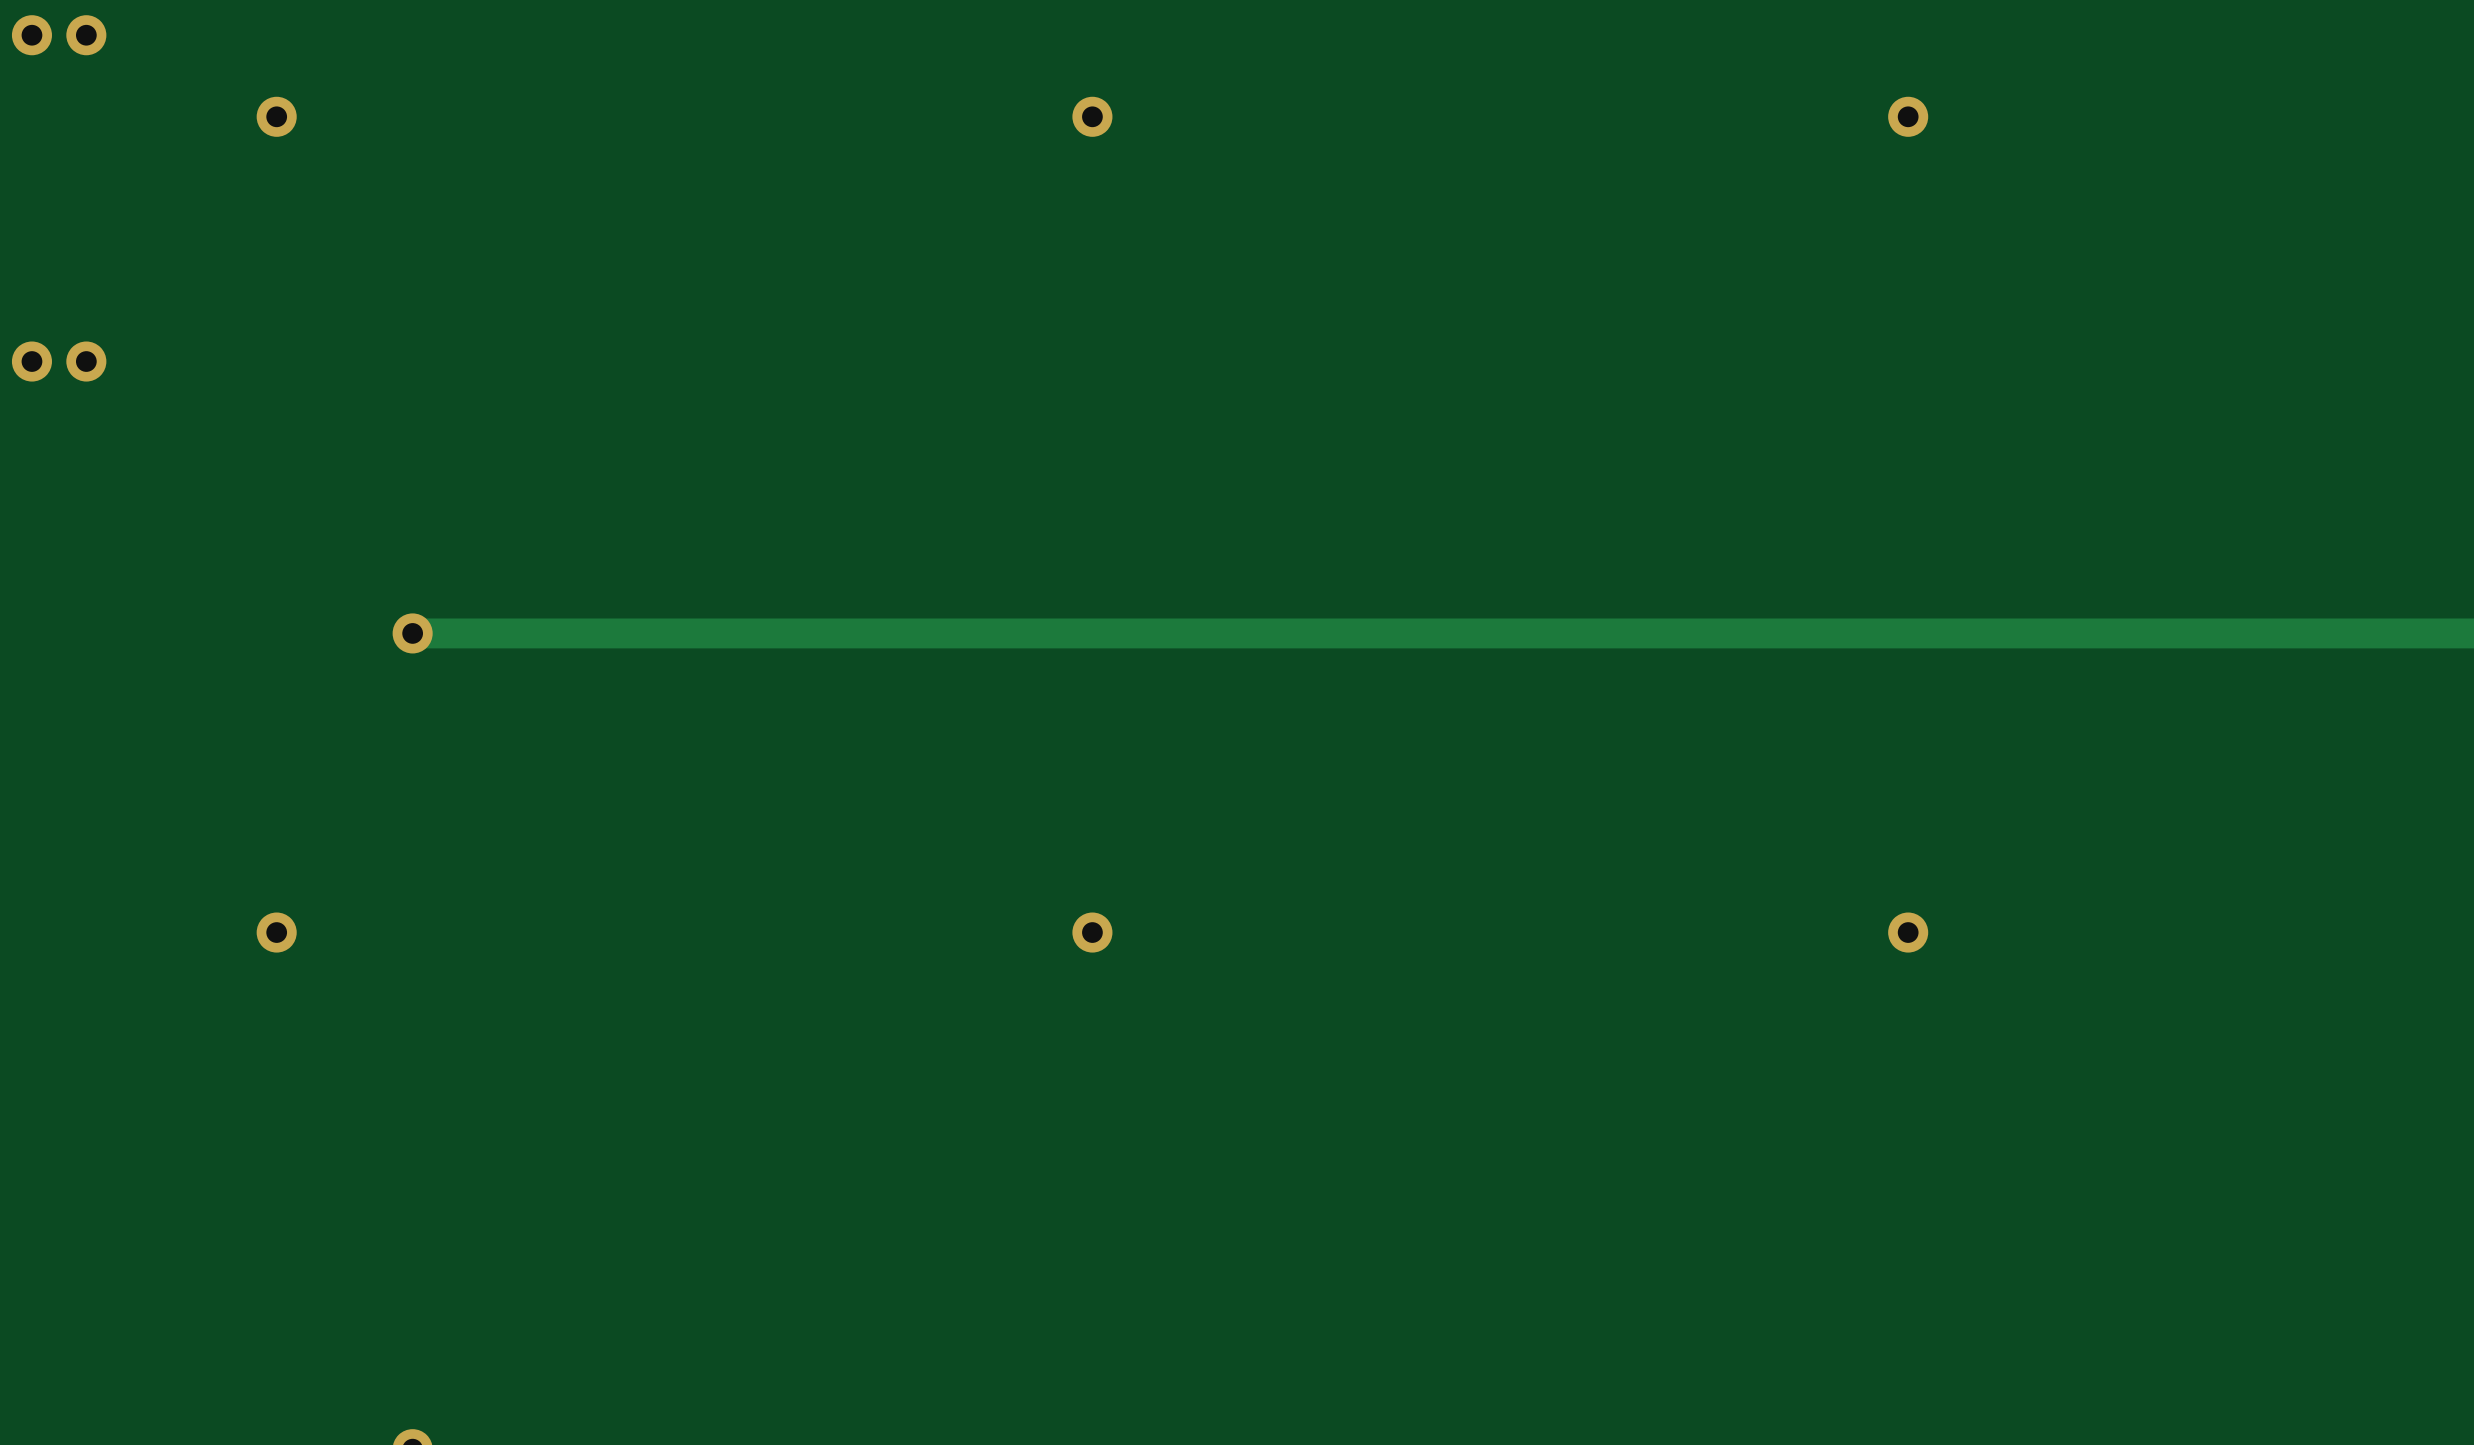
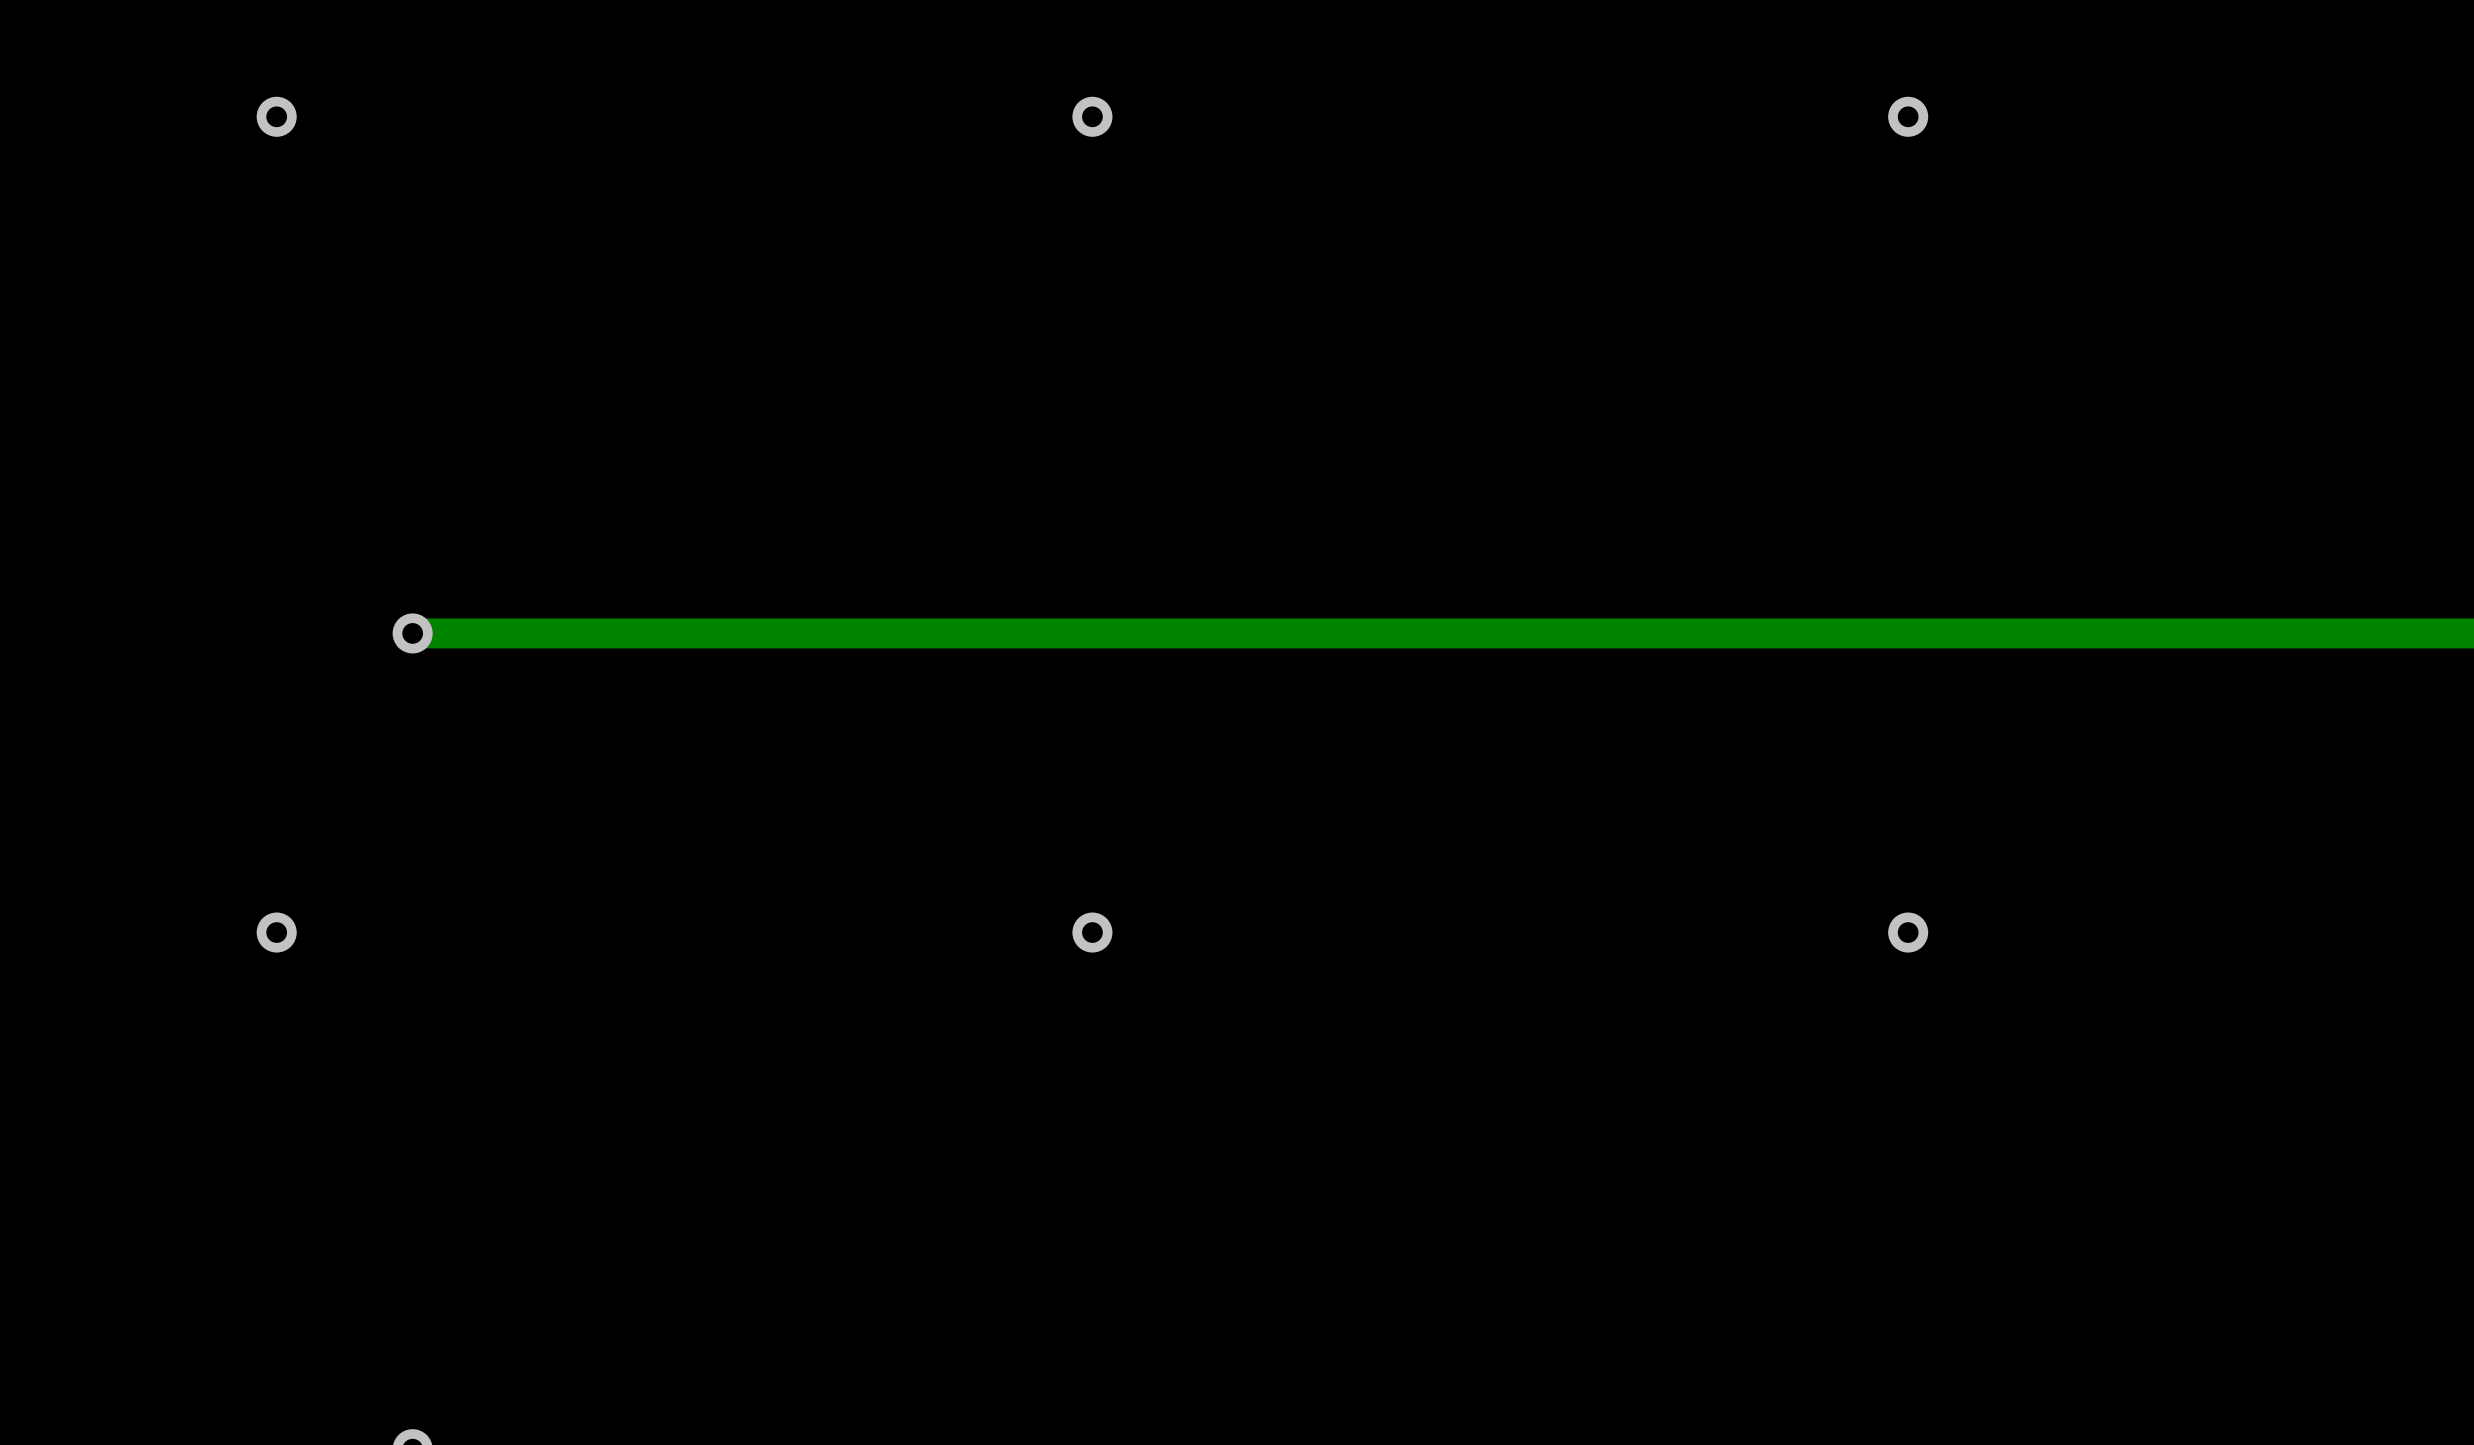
via: (31, 35) -> none
via: (86, 35) -> none
via: (31, 361) -> none
via: (86, 361) -> none

